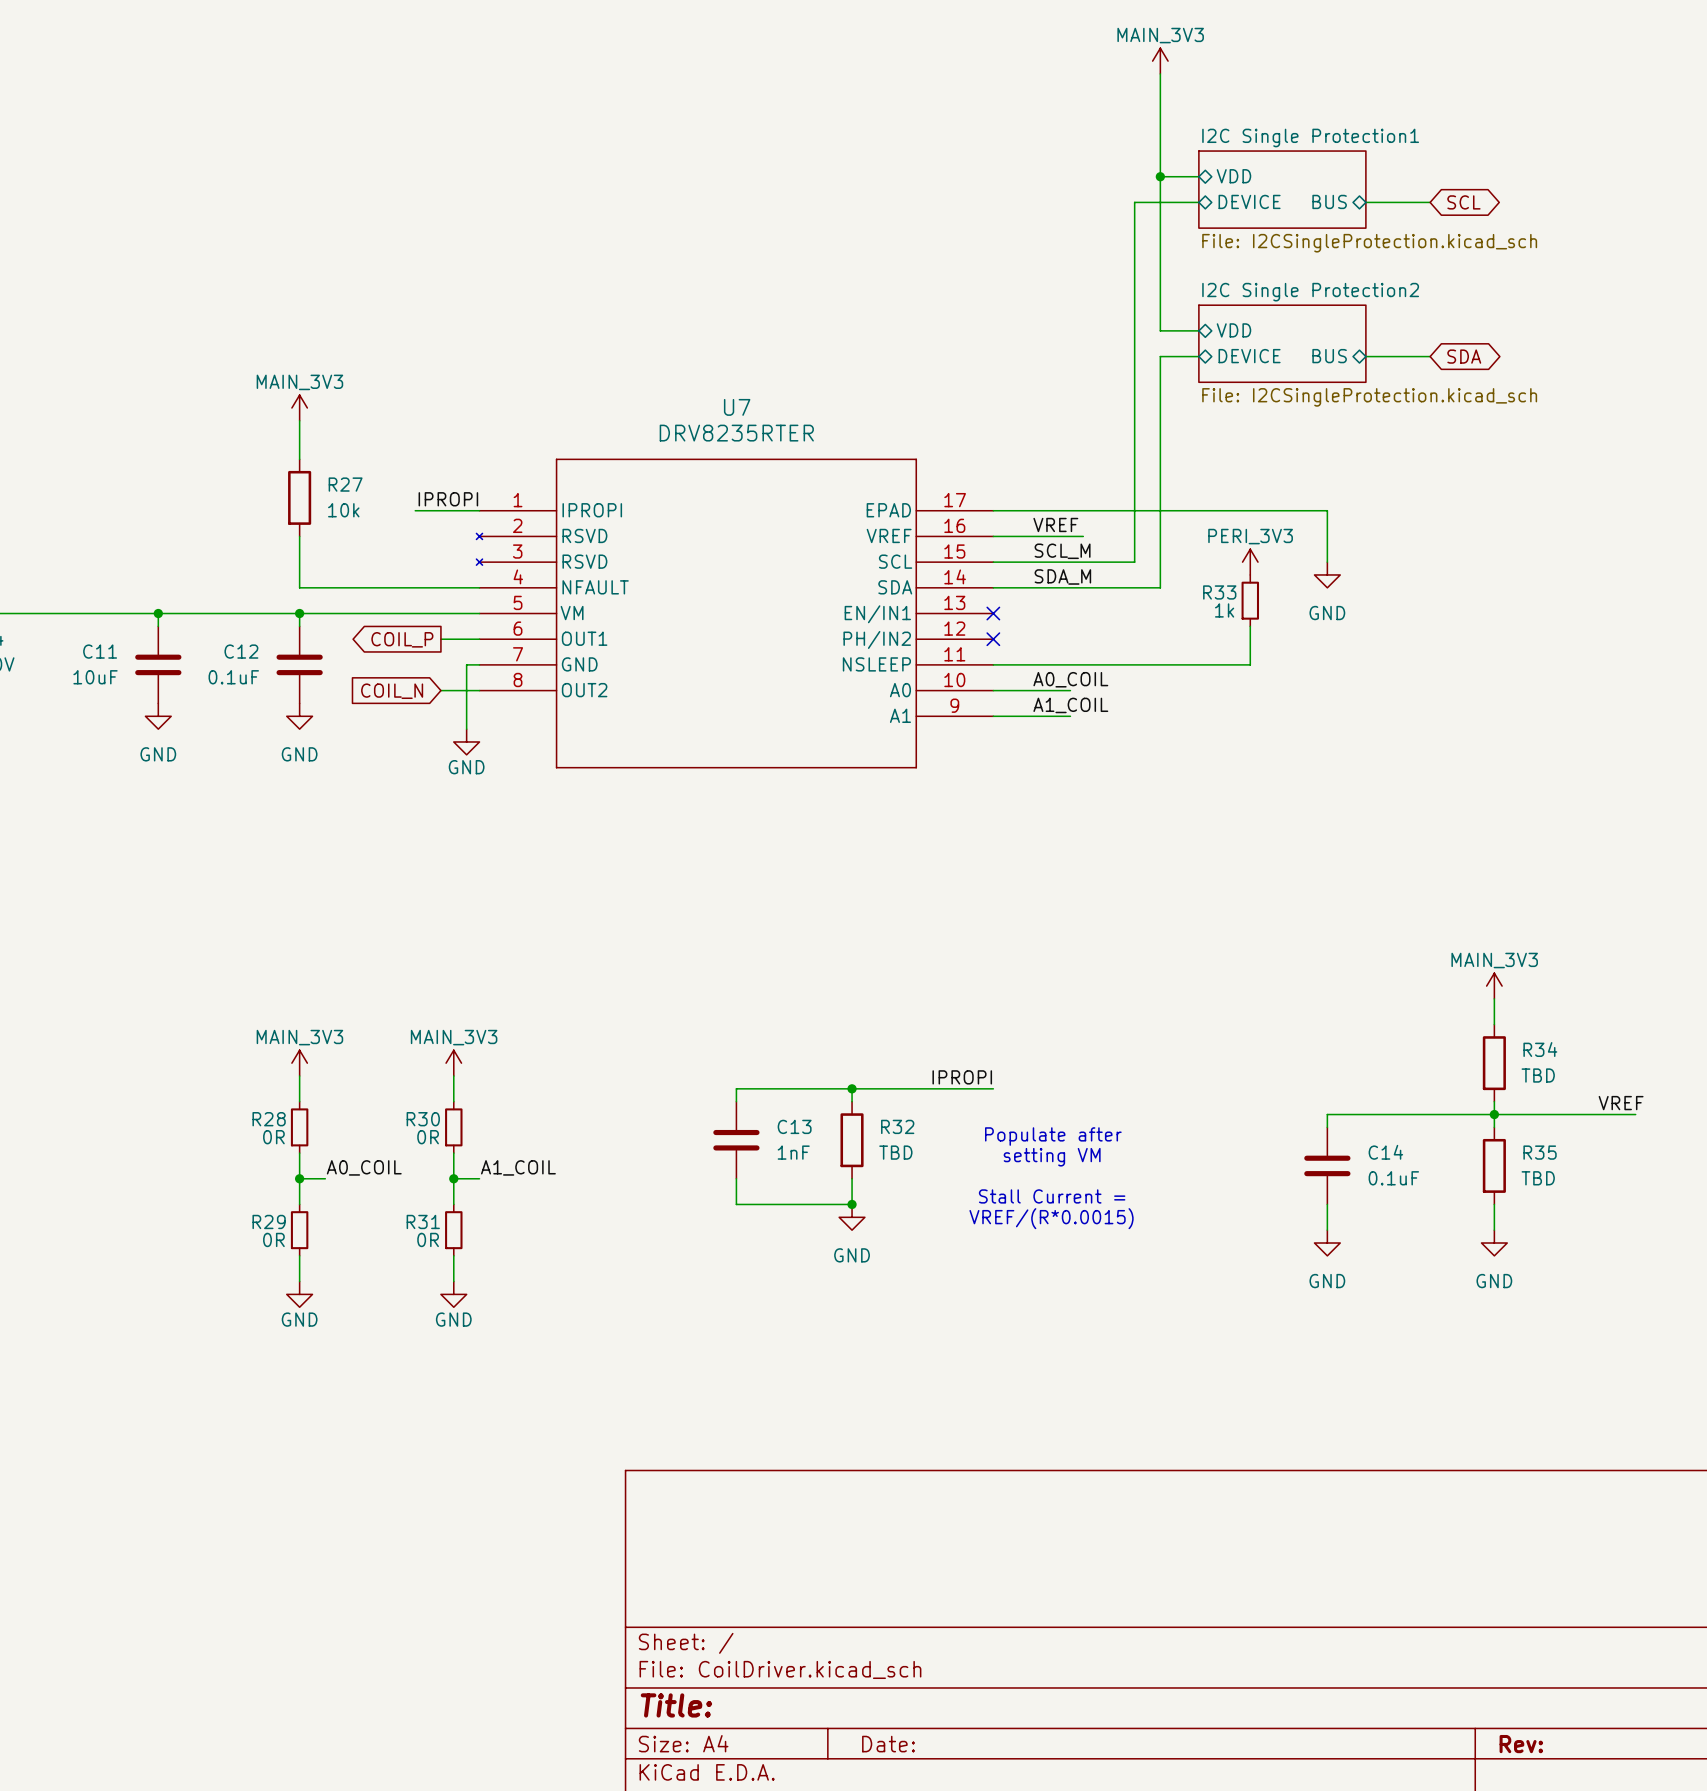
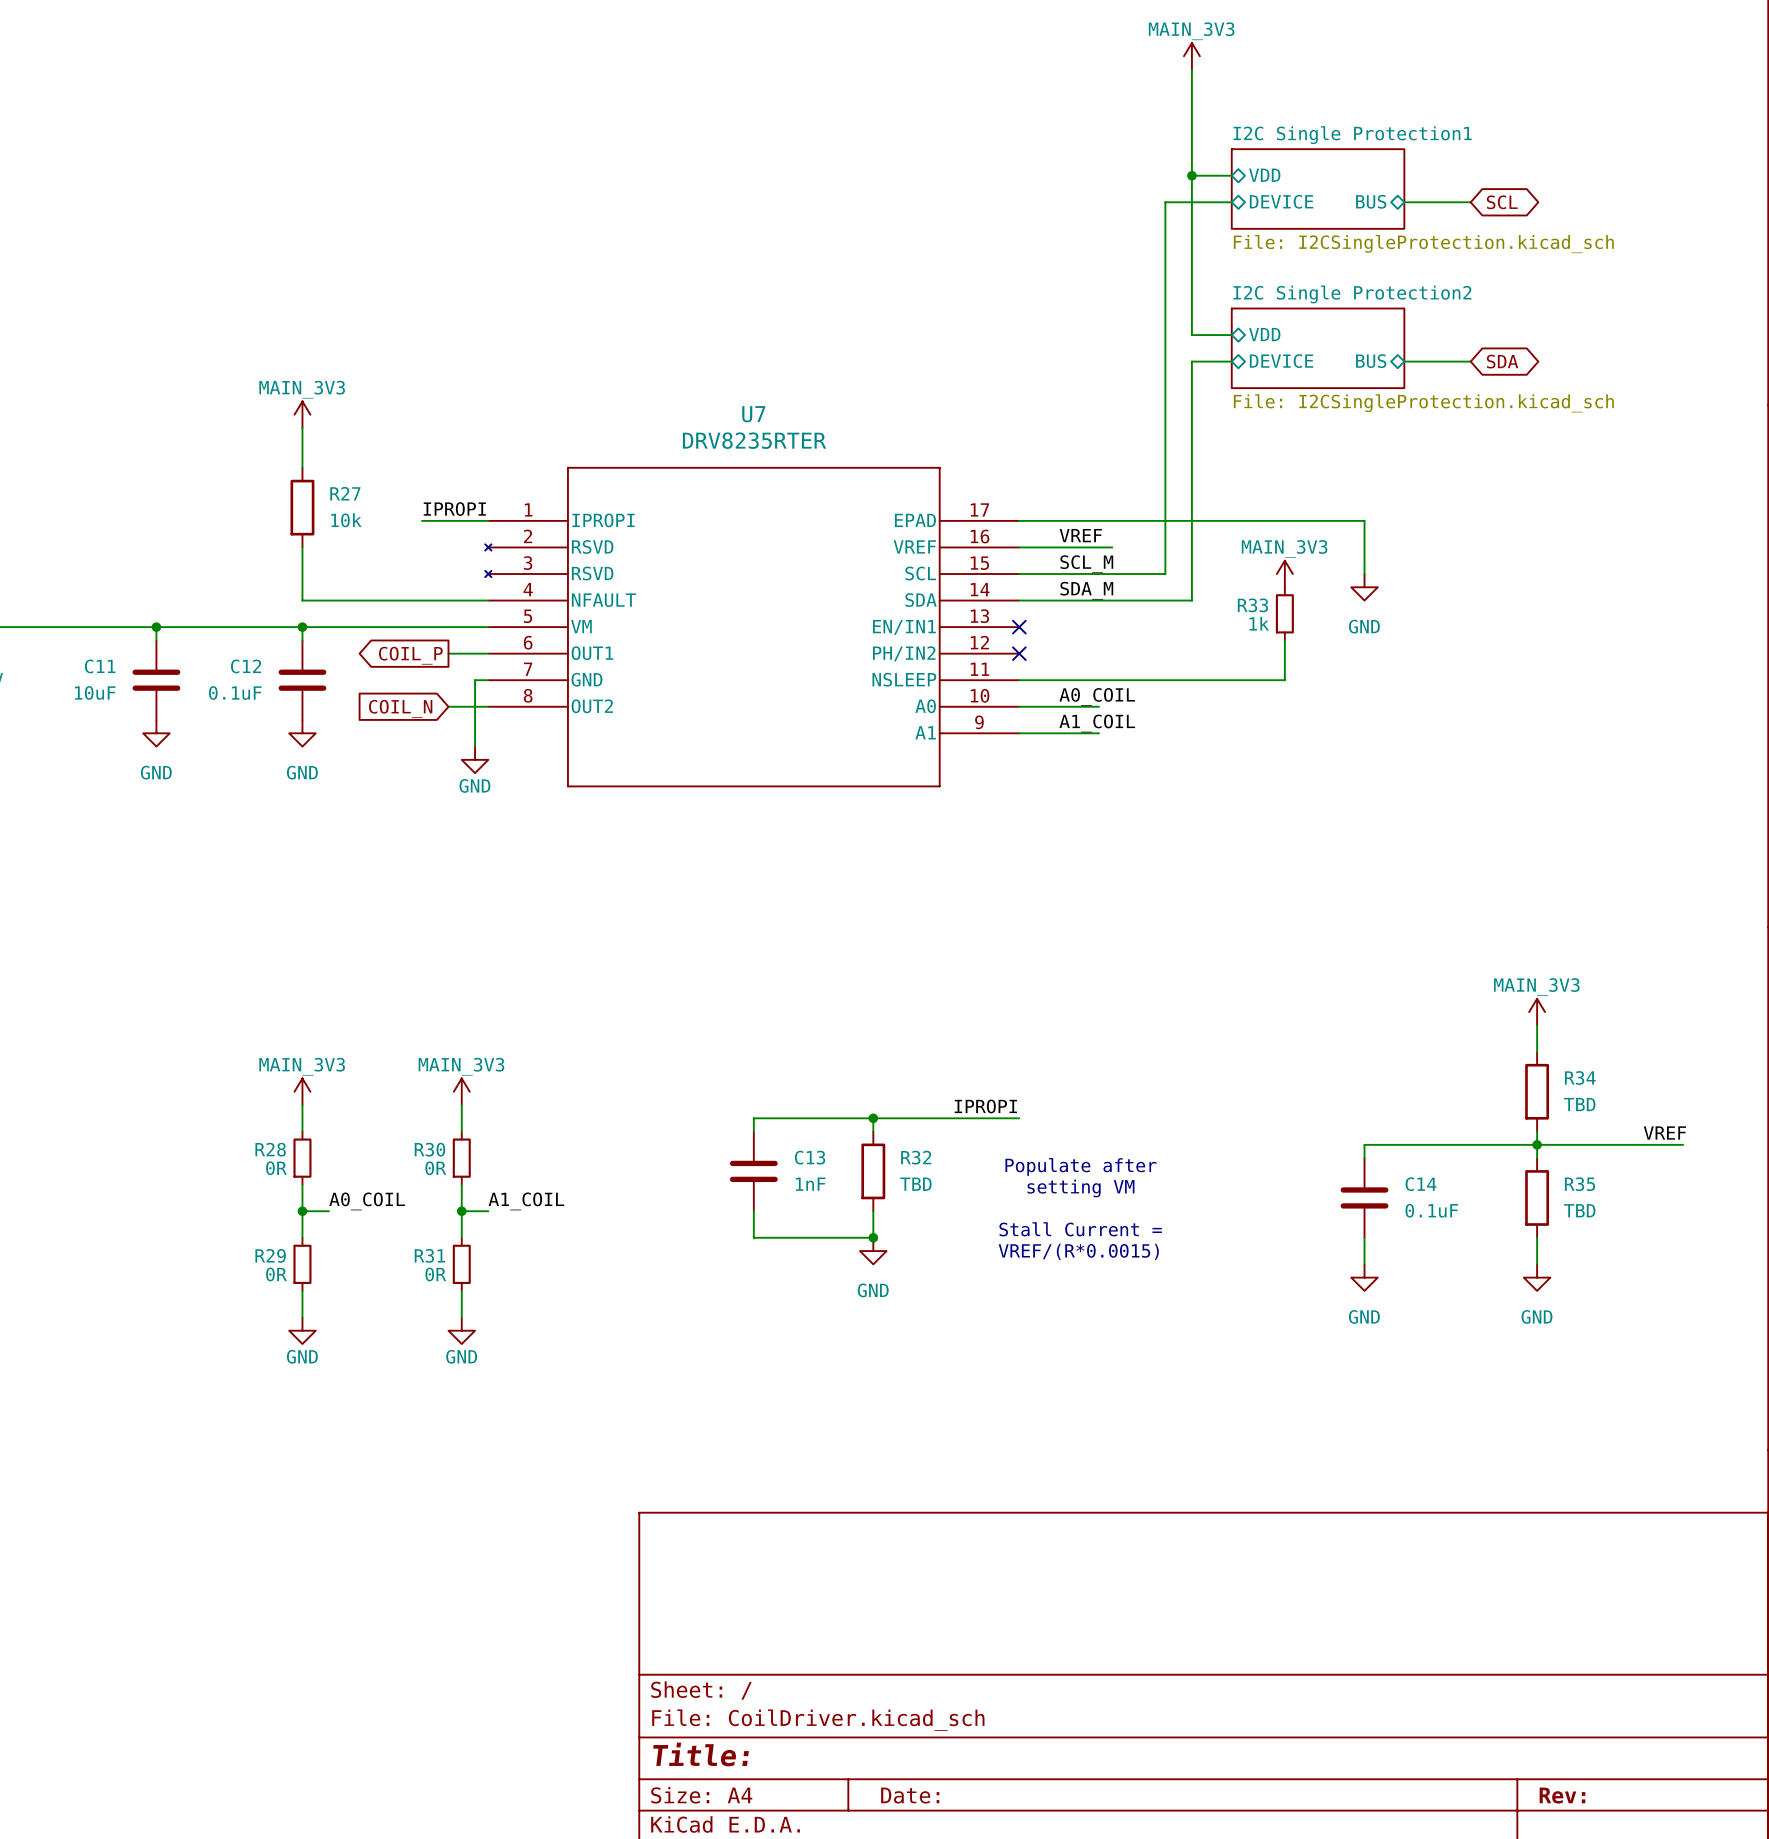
power symbol: PERI_3V3 (1250, 562) -> MAIN_3V3 (1284, 574)

